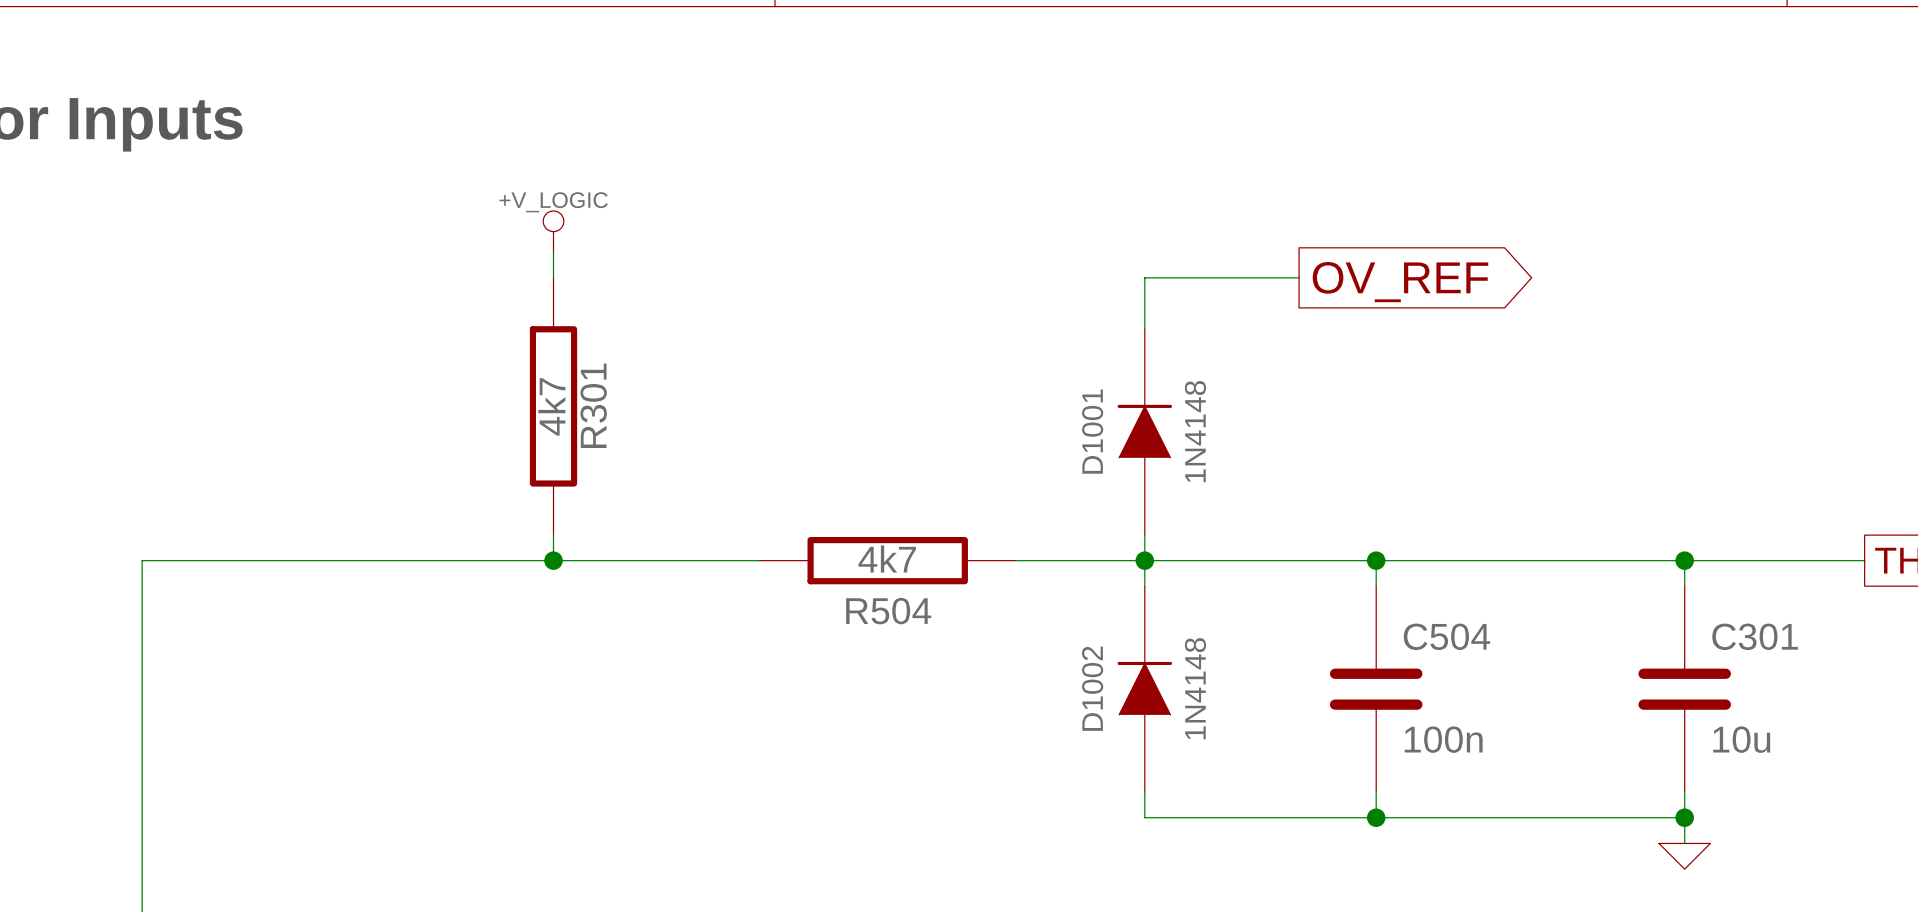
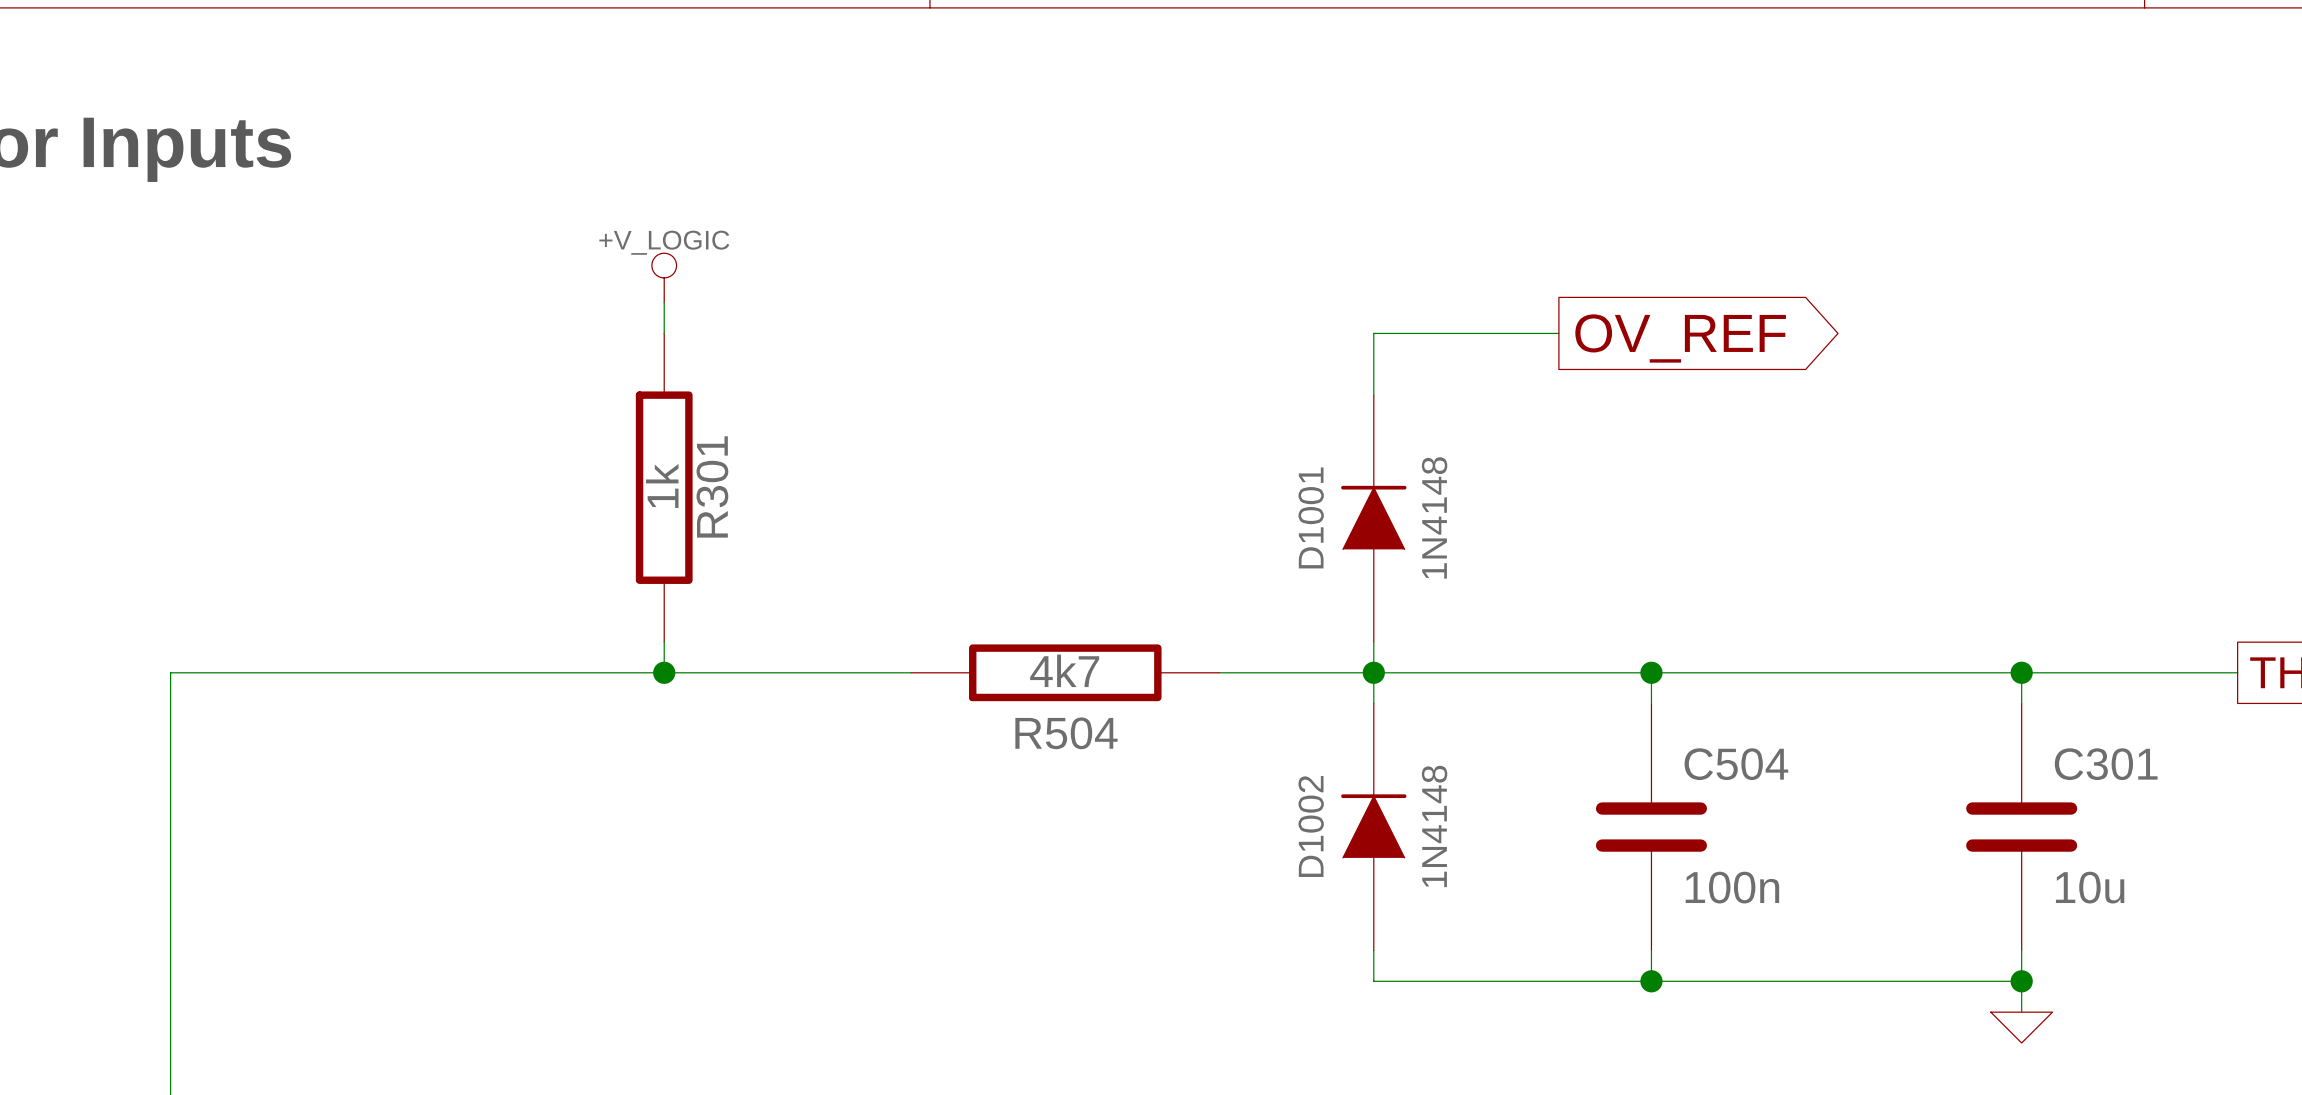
R301 value: 4k7 (551, 406) -> 1k (662, 485)

